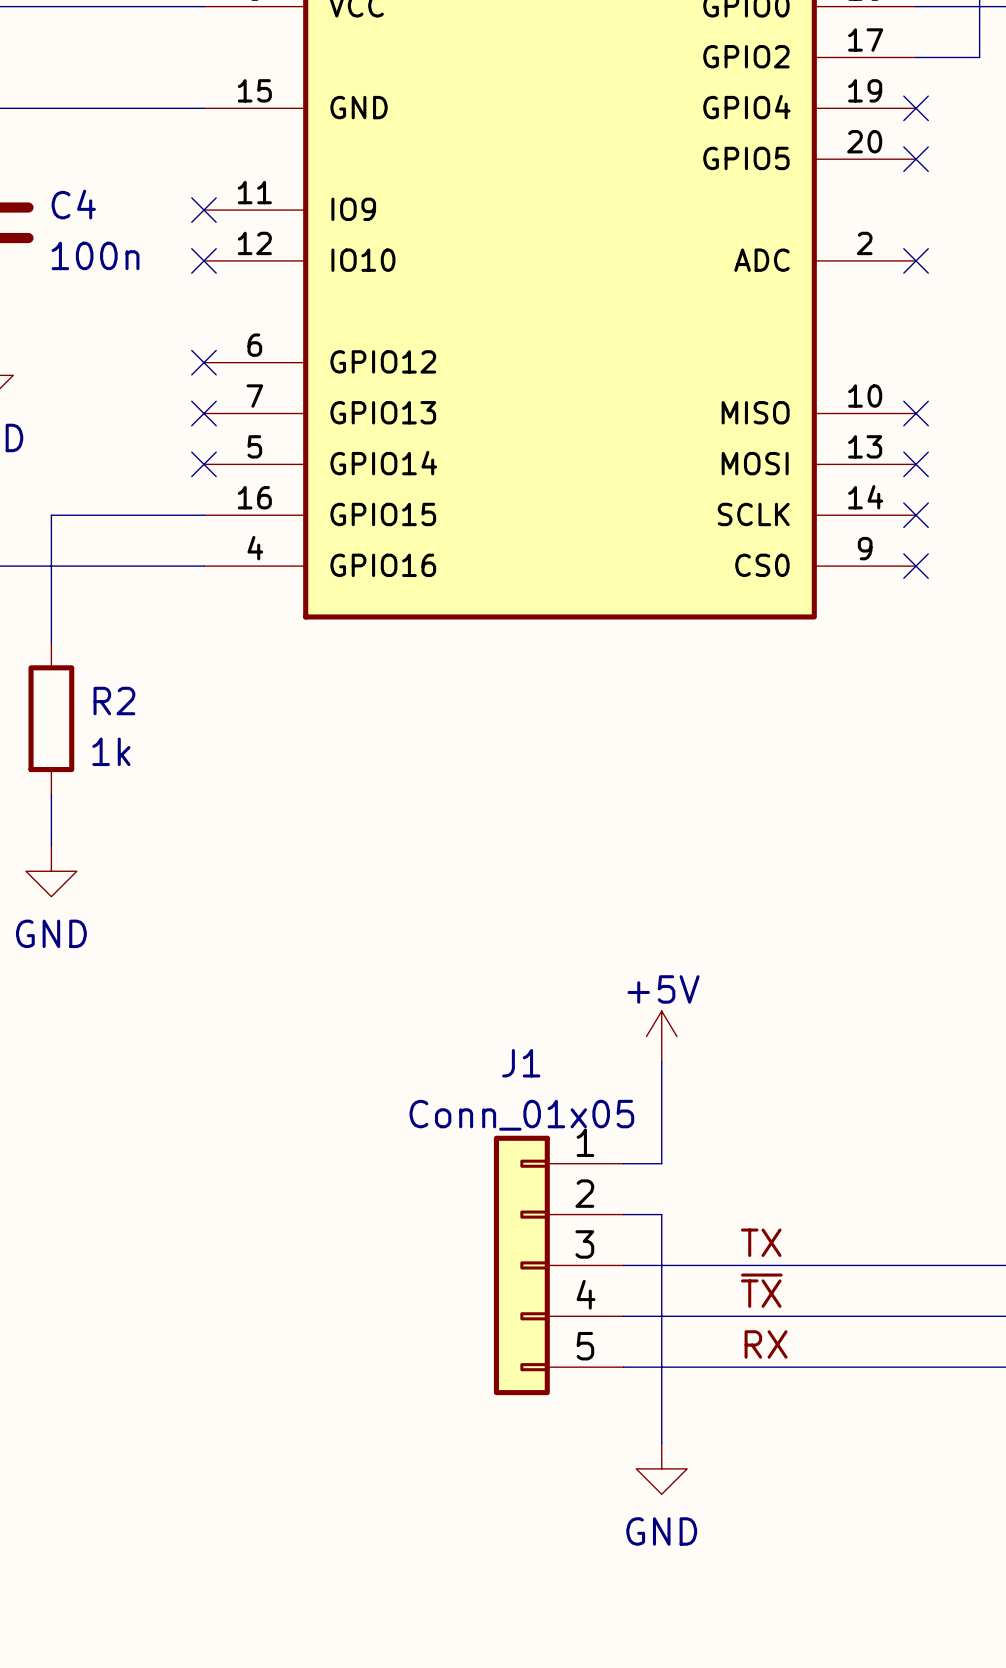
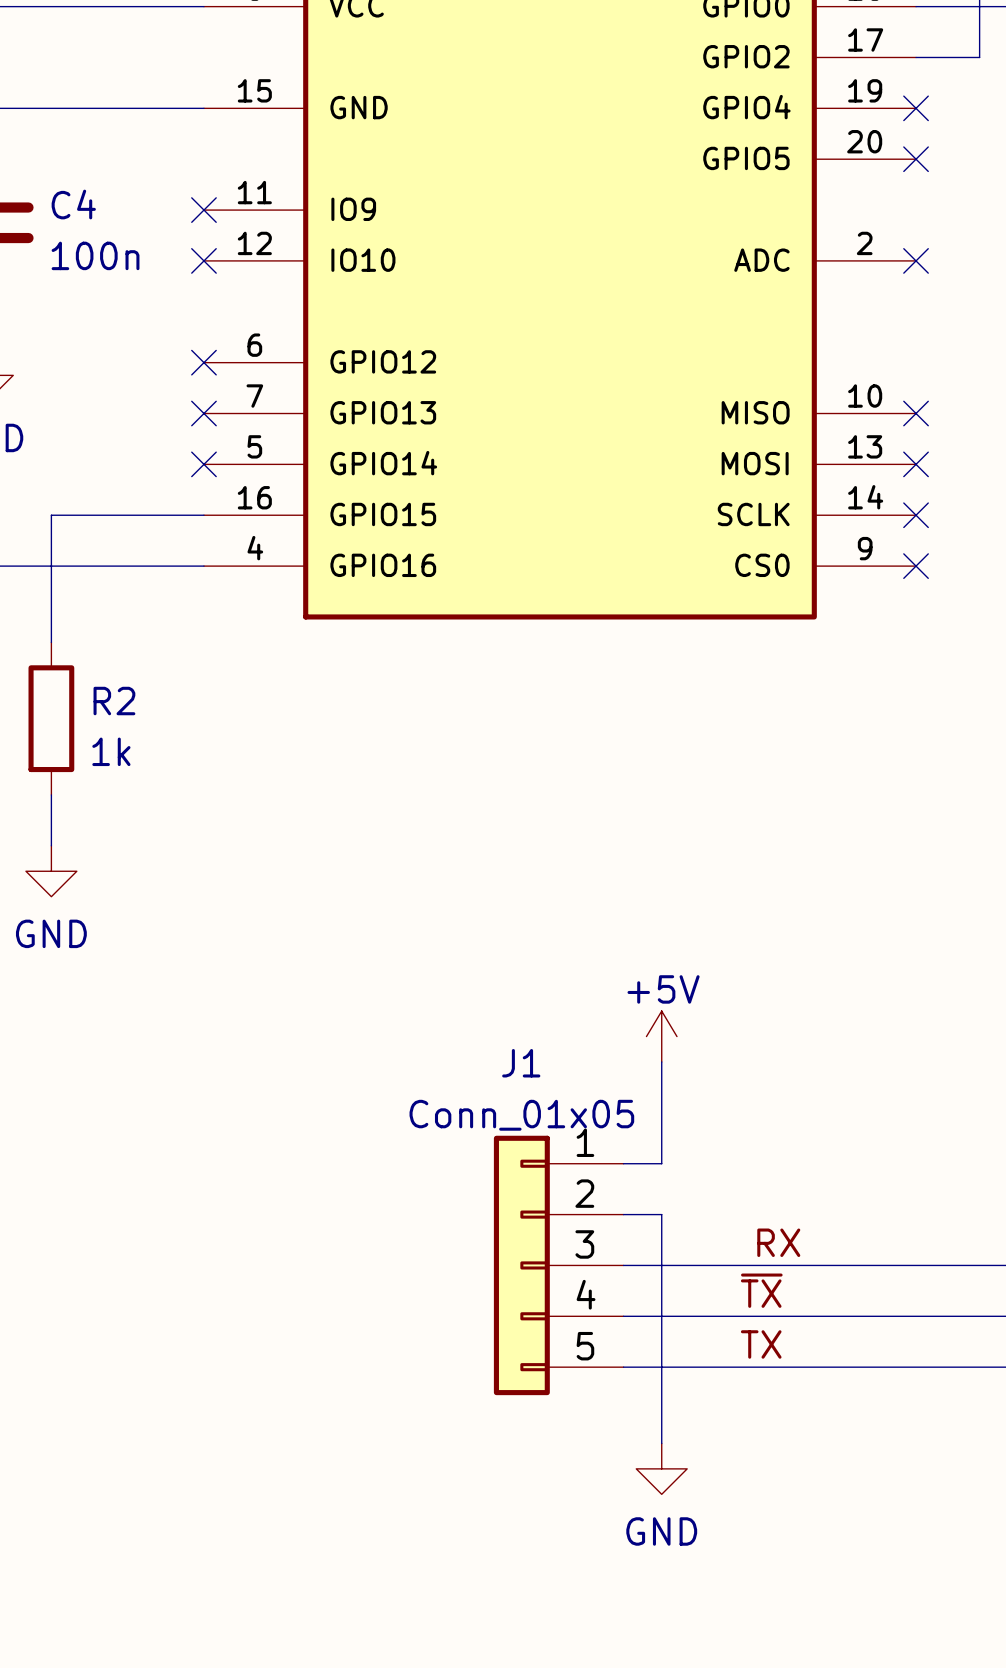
label: TX (761, 1242) -> RX (778, 1242)
label: RX (766, 1344) -> TX (761, 1344)

